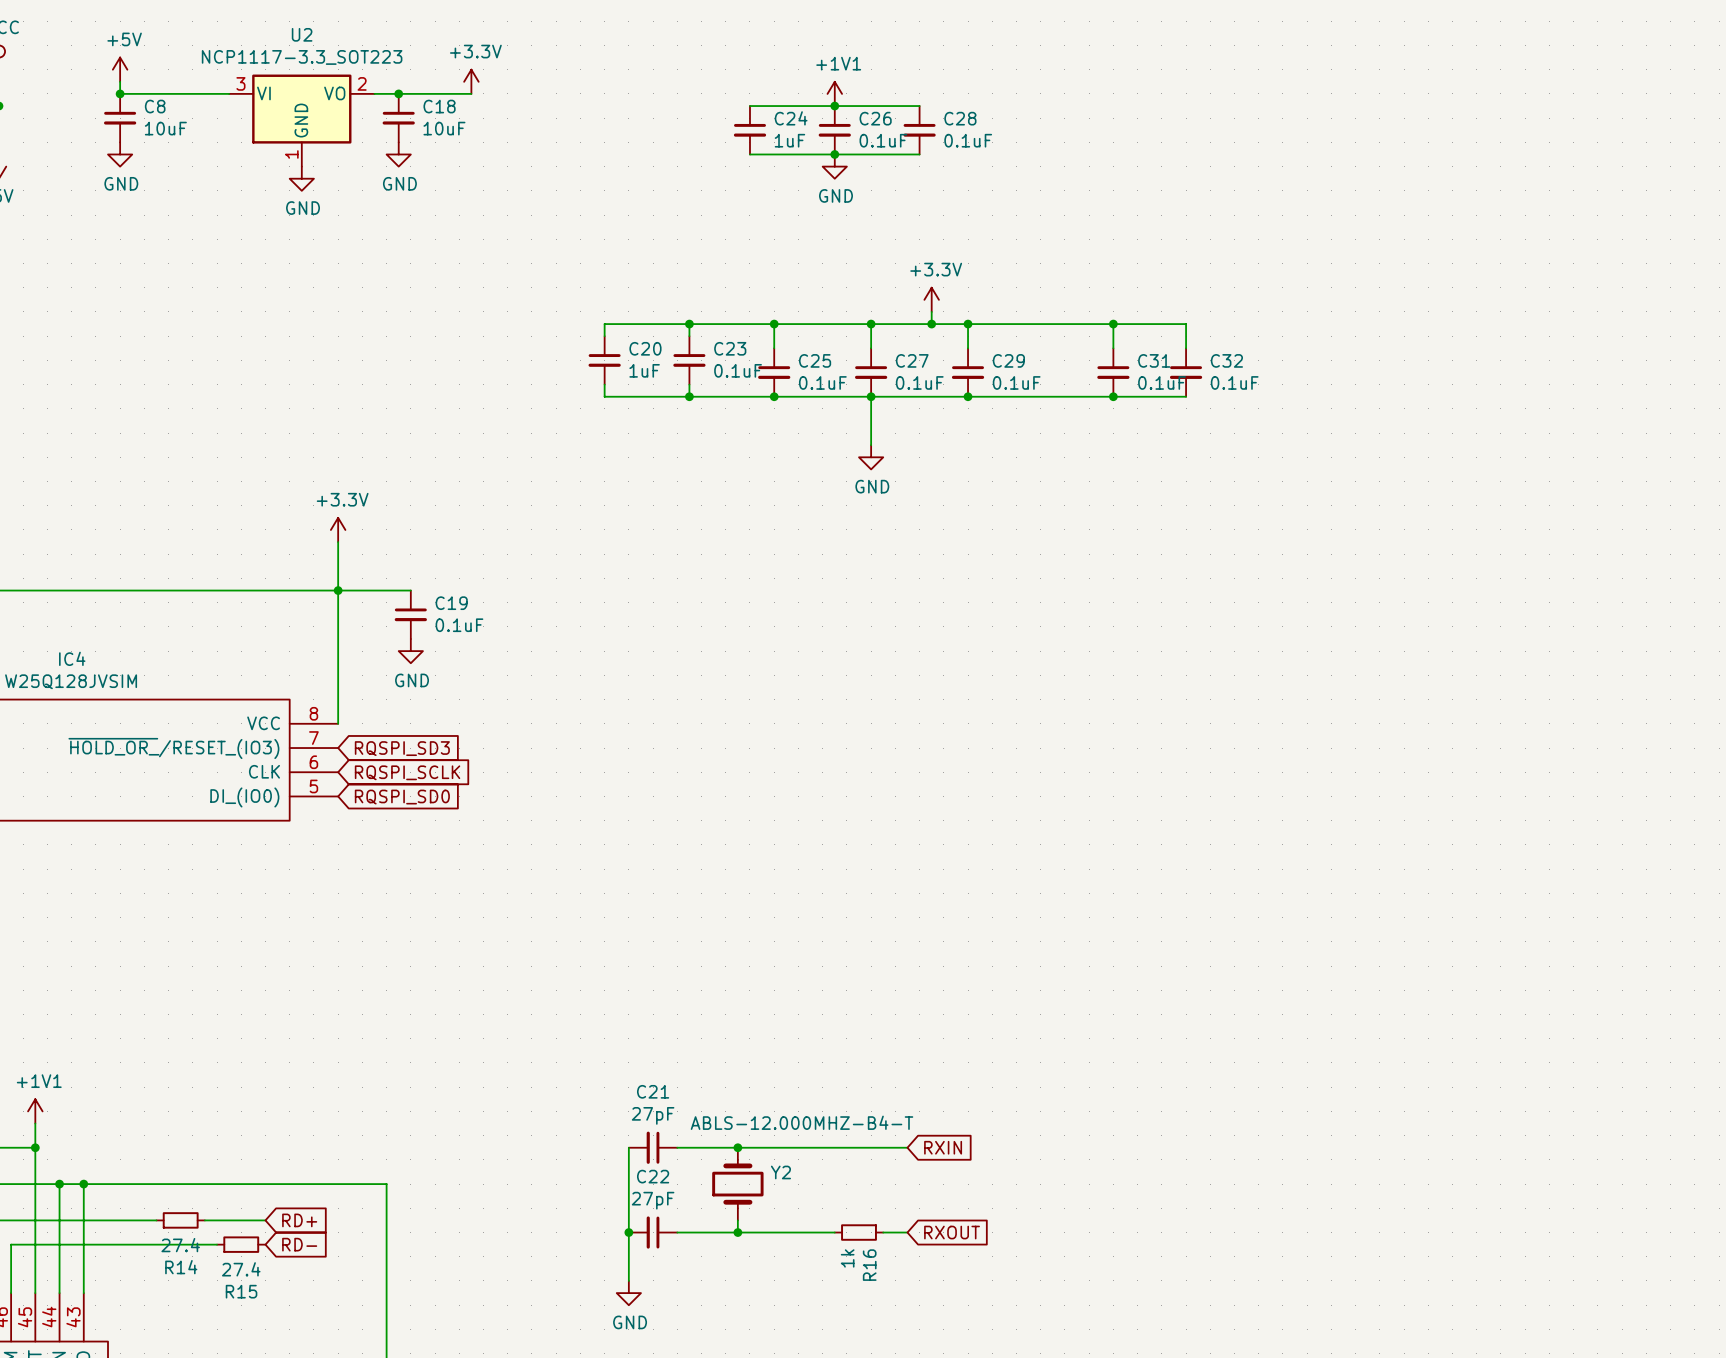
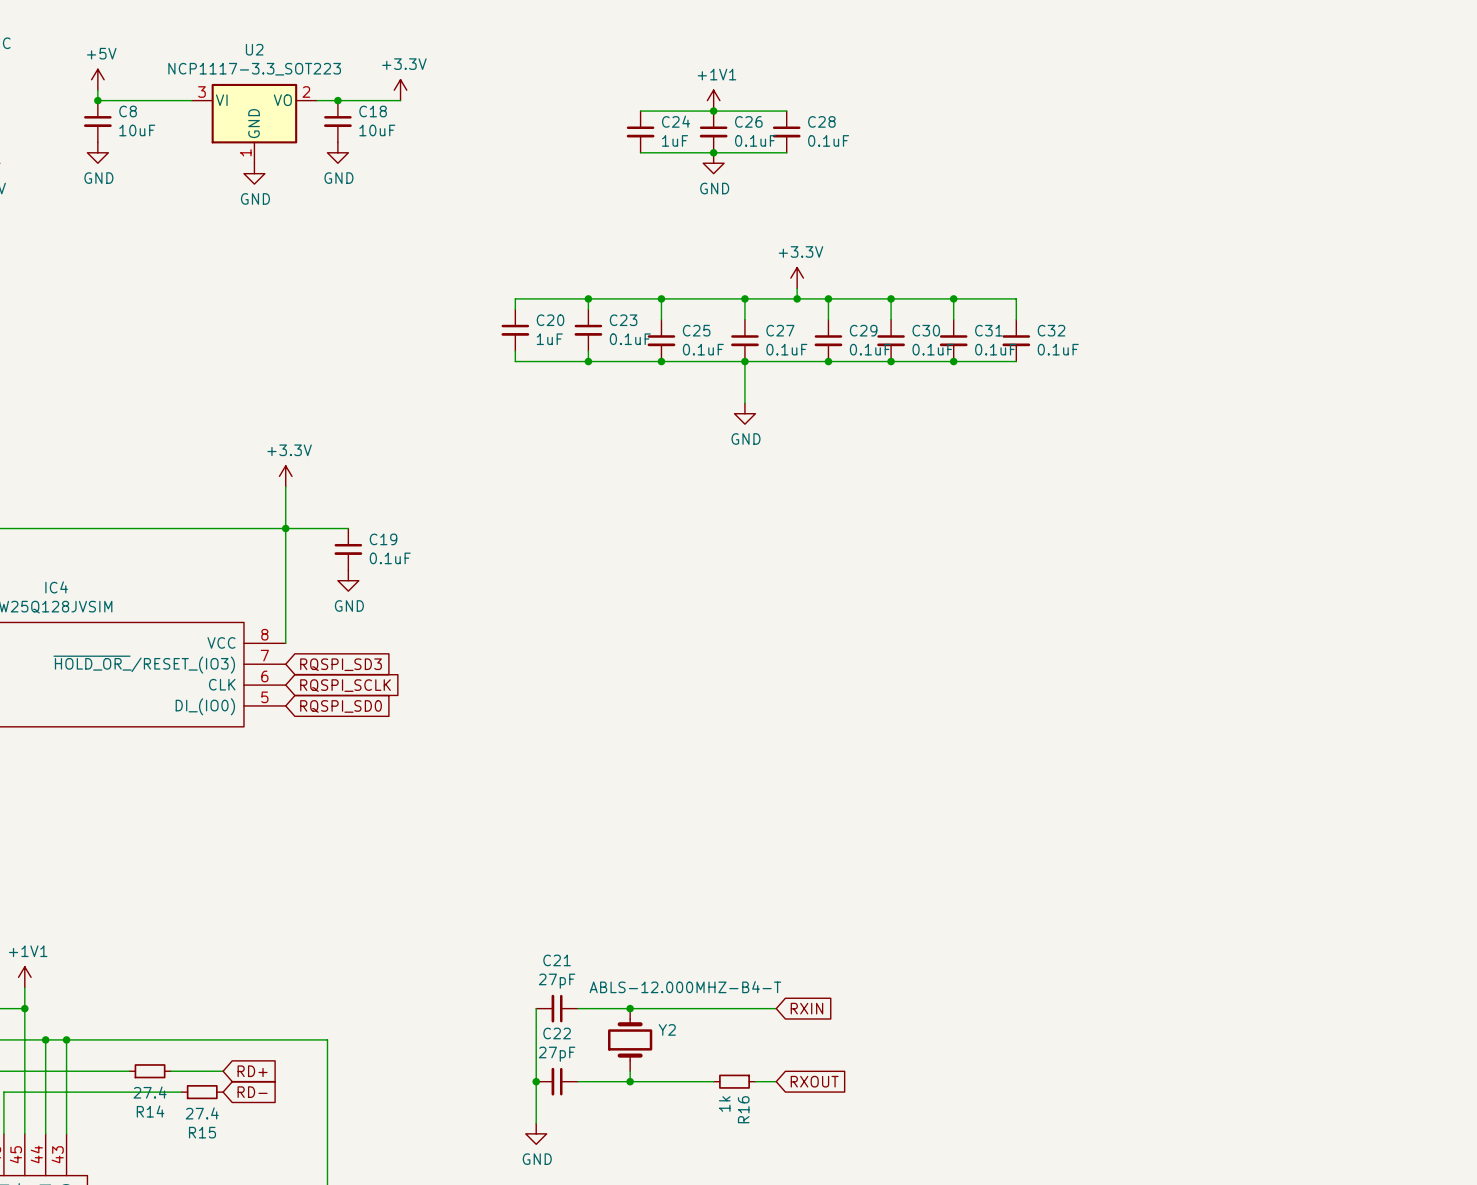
wire: none -> (891, 298) (891, 319)
junction: none -> (891, 298)
C30: none -> 0.1uF (891, 340)
junction: none -> (891, 361)

